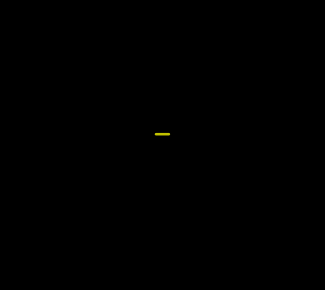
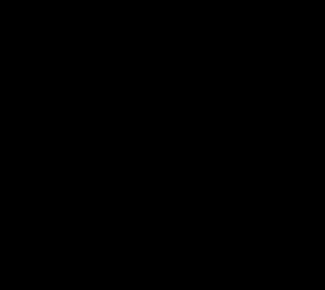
board edge: (168, 134) (155, 134) -> none

